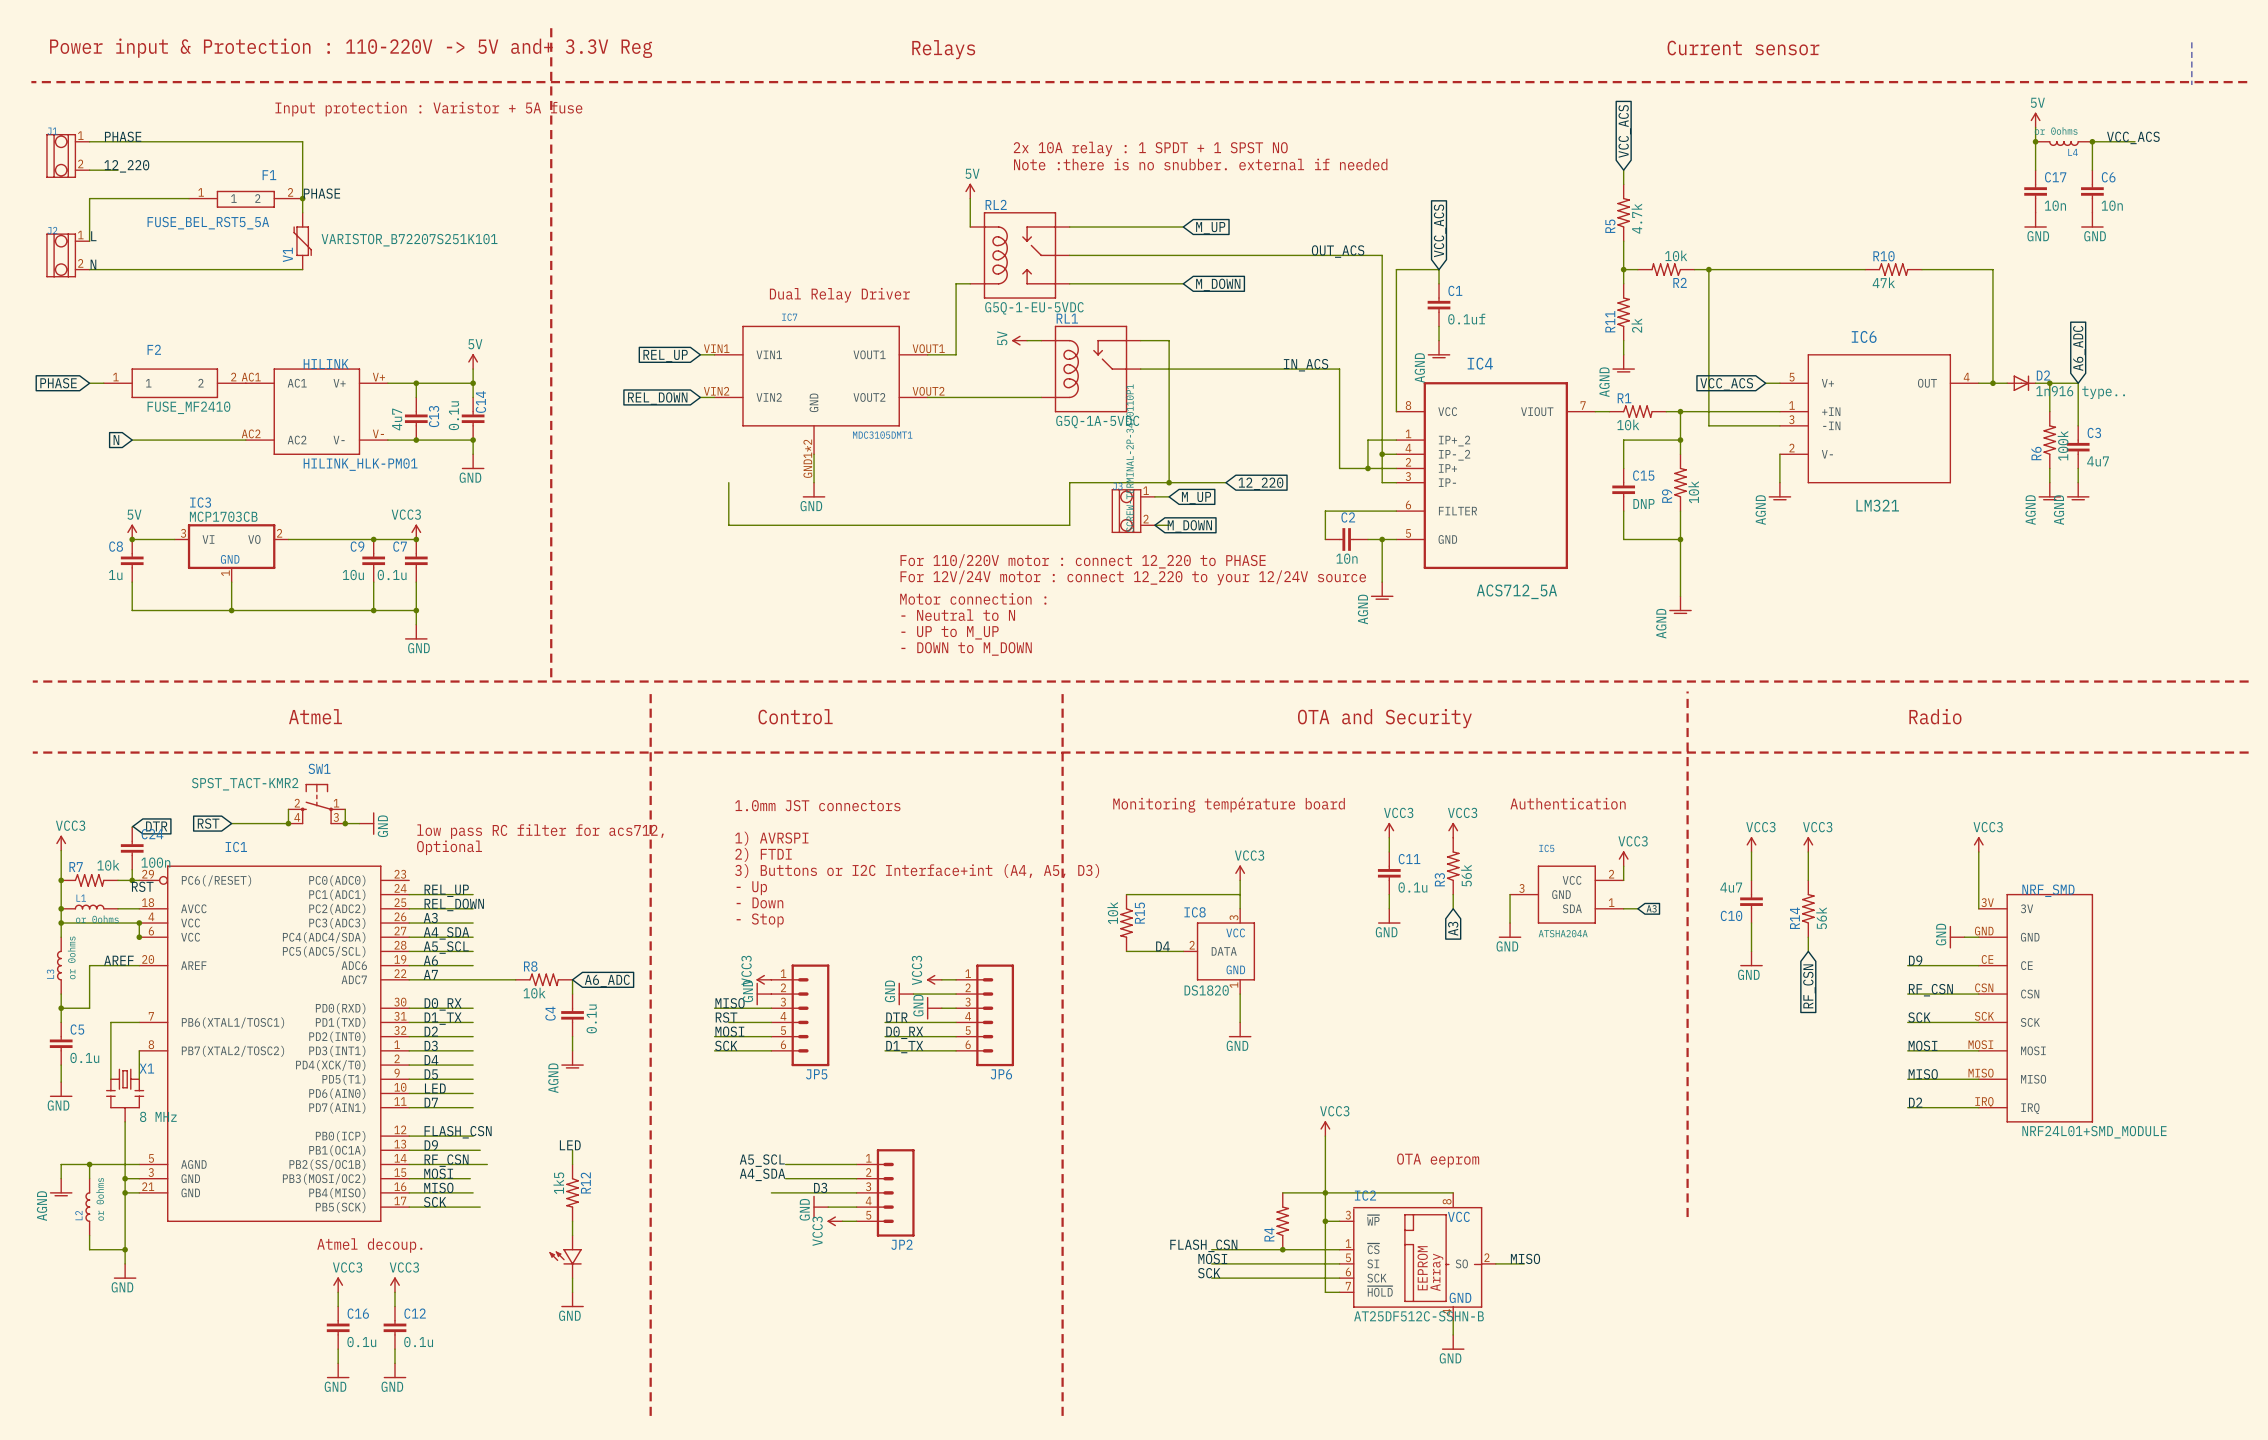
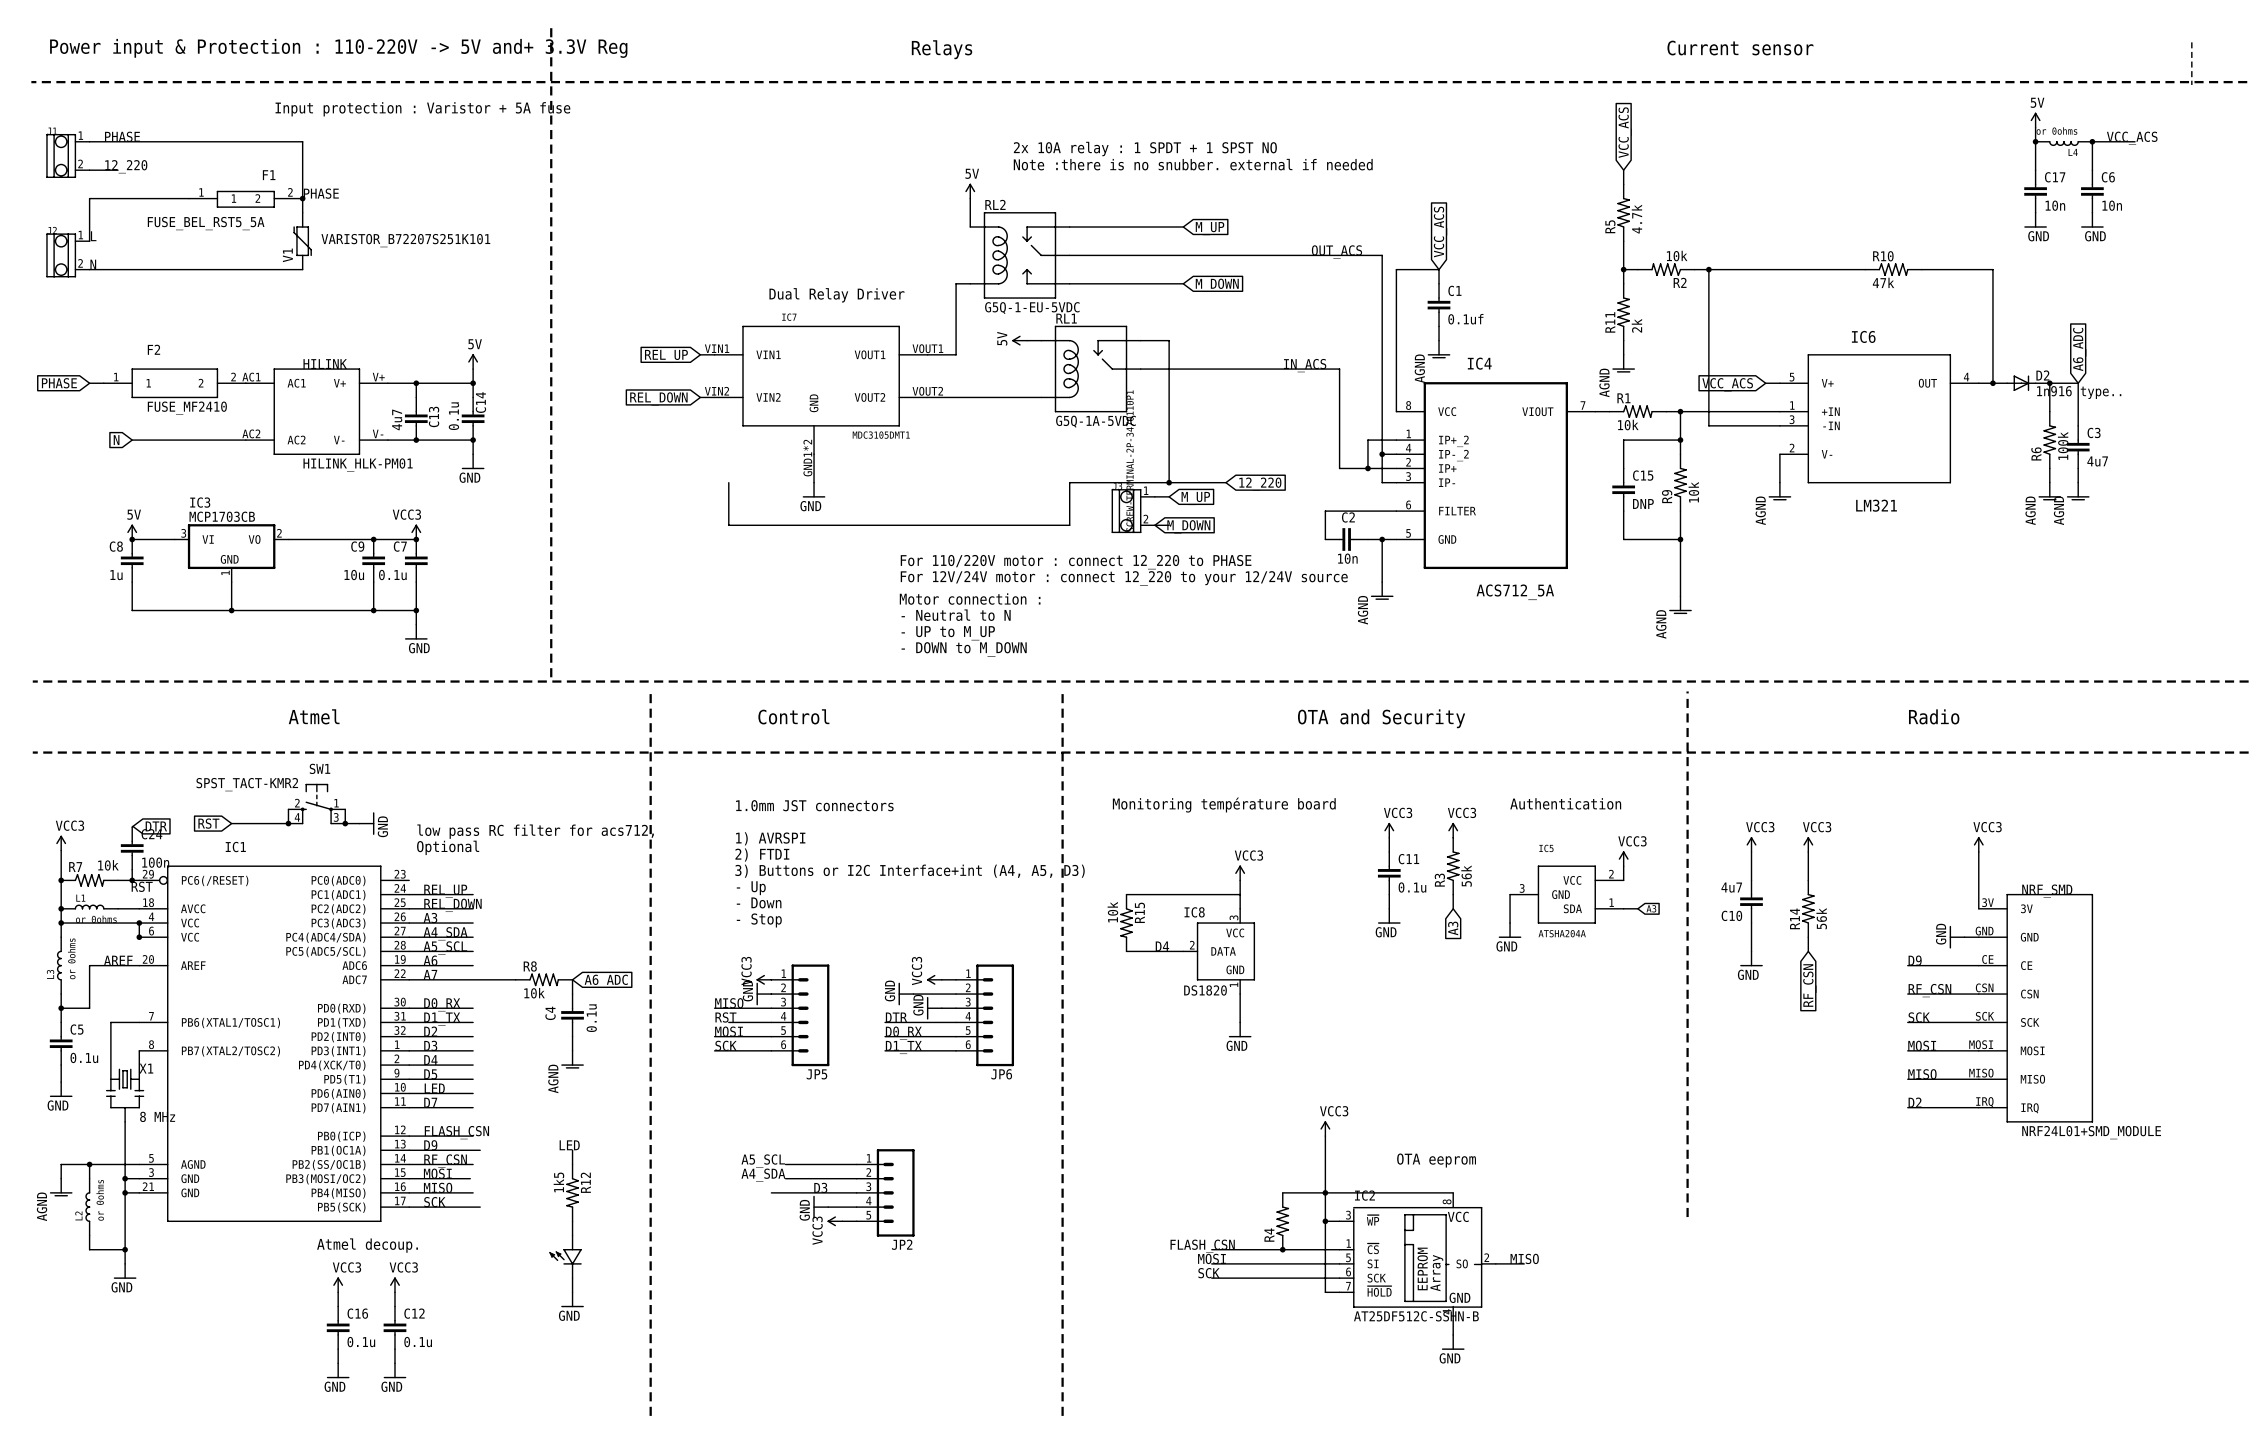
wire: (473, 1164) (487, 1164) -> none

